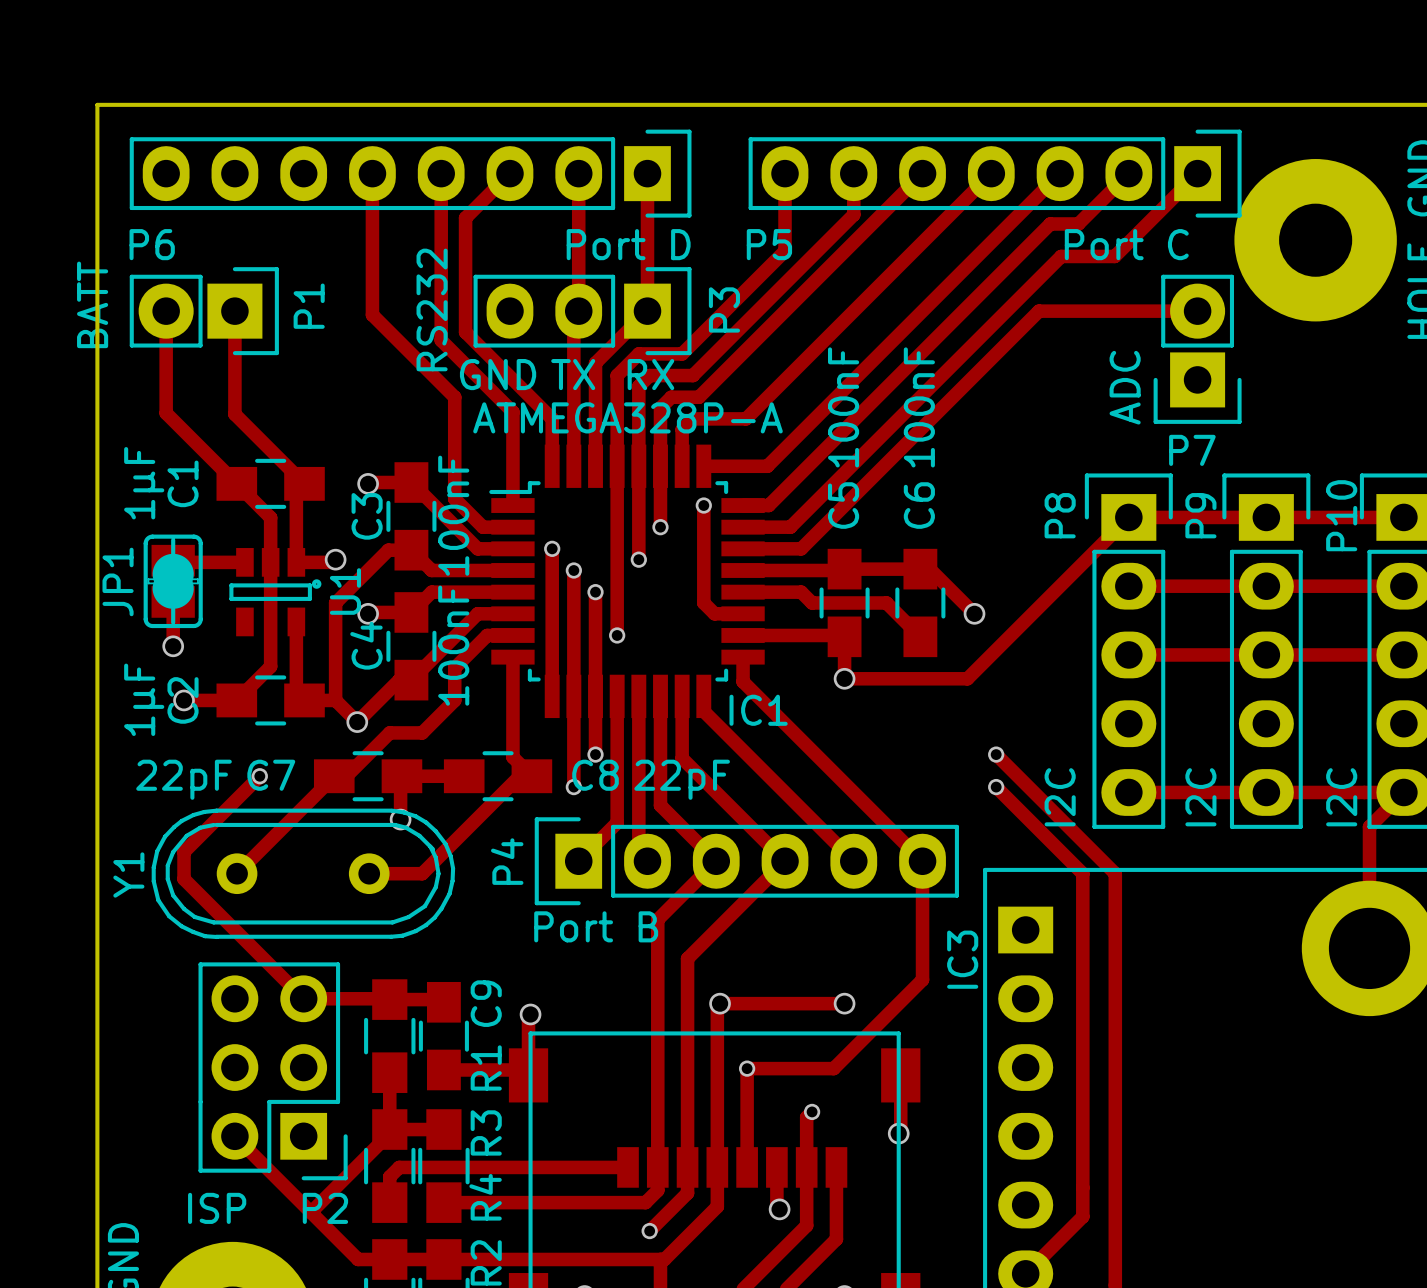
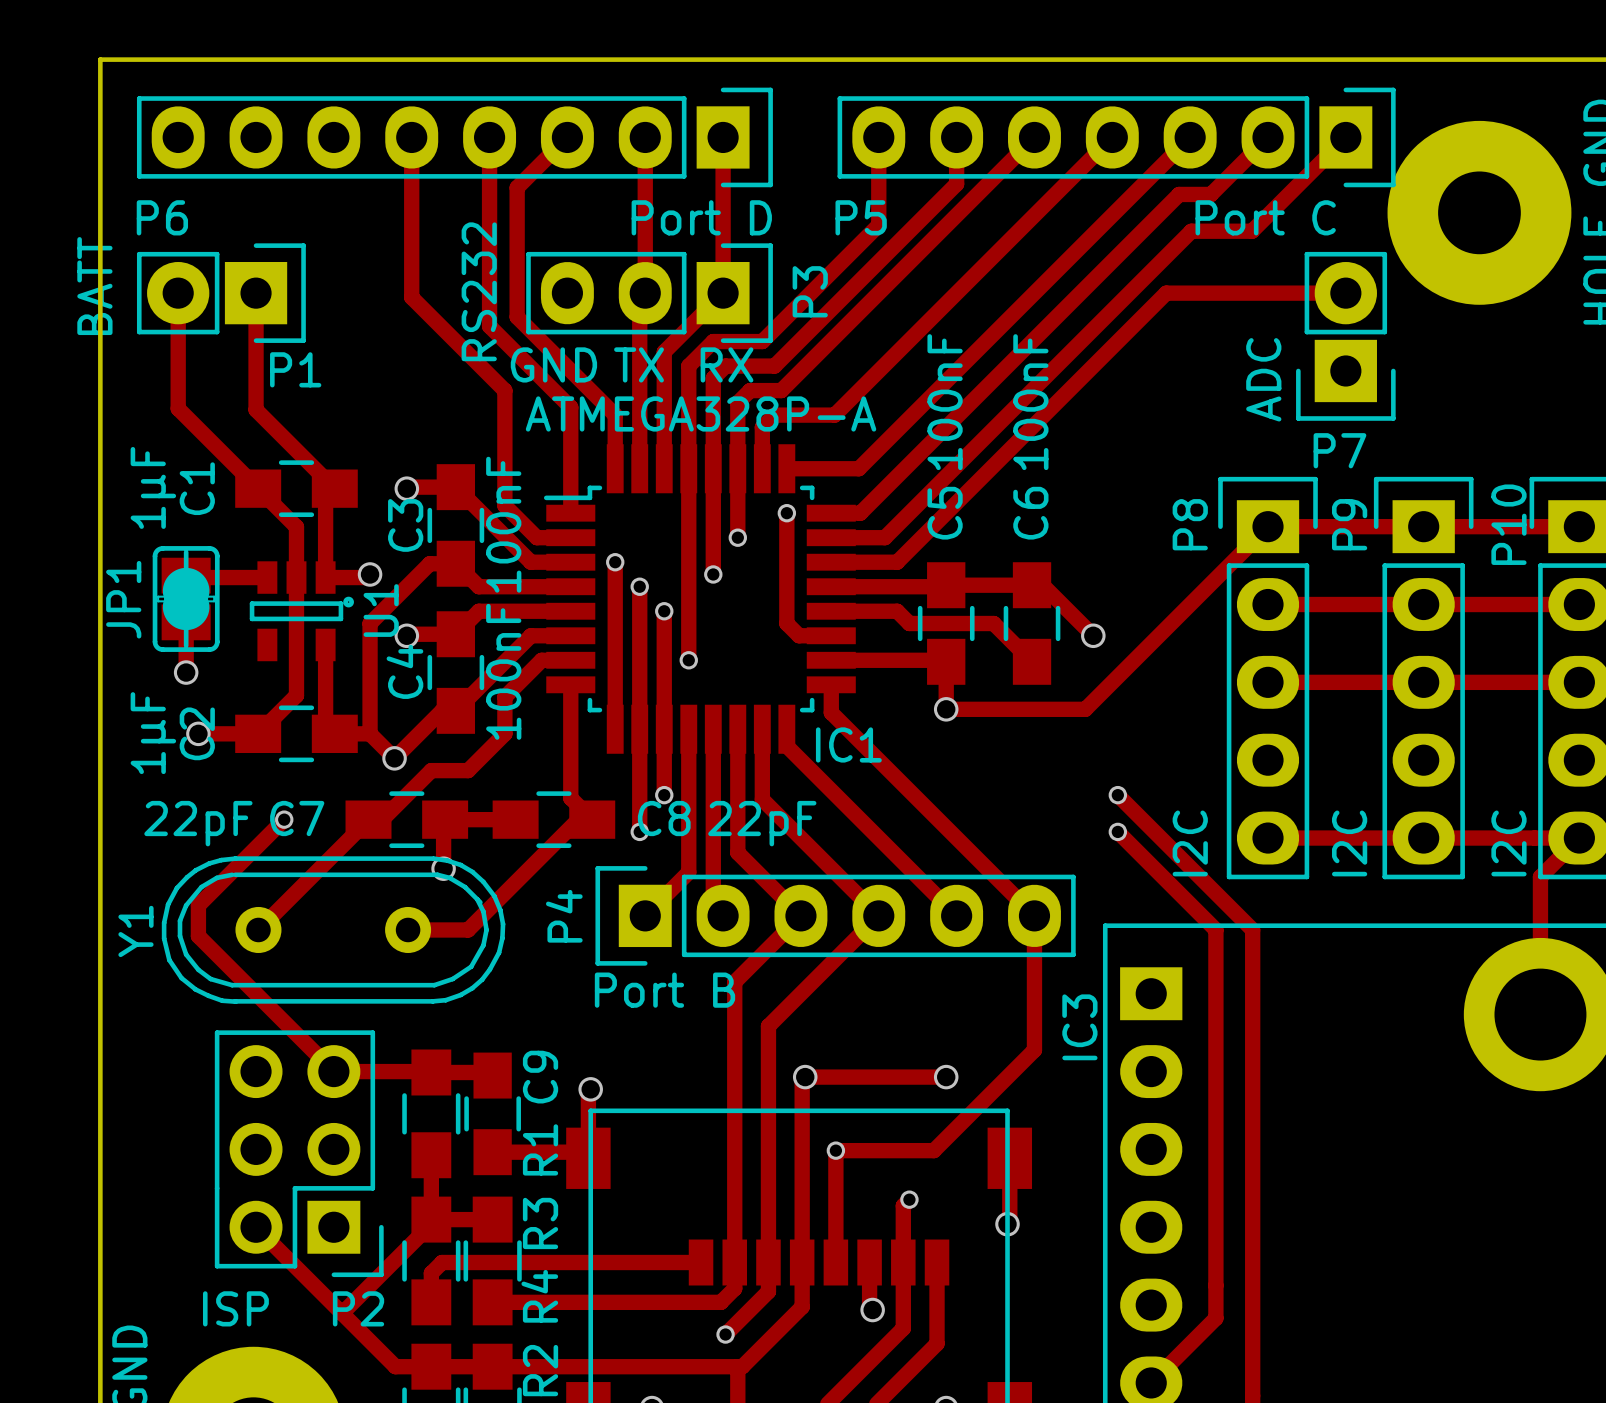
P1 name rotation: 0° (309, 306) -> 90° clockwise (295, 369)
P1 name position: P1 (309, 306) -> P1 (295, 369)

